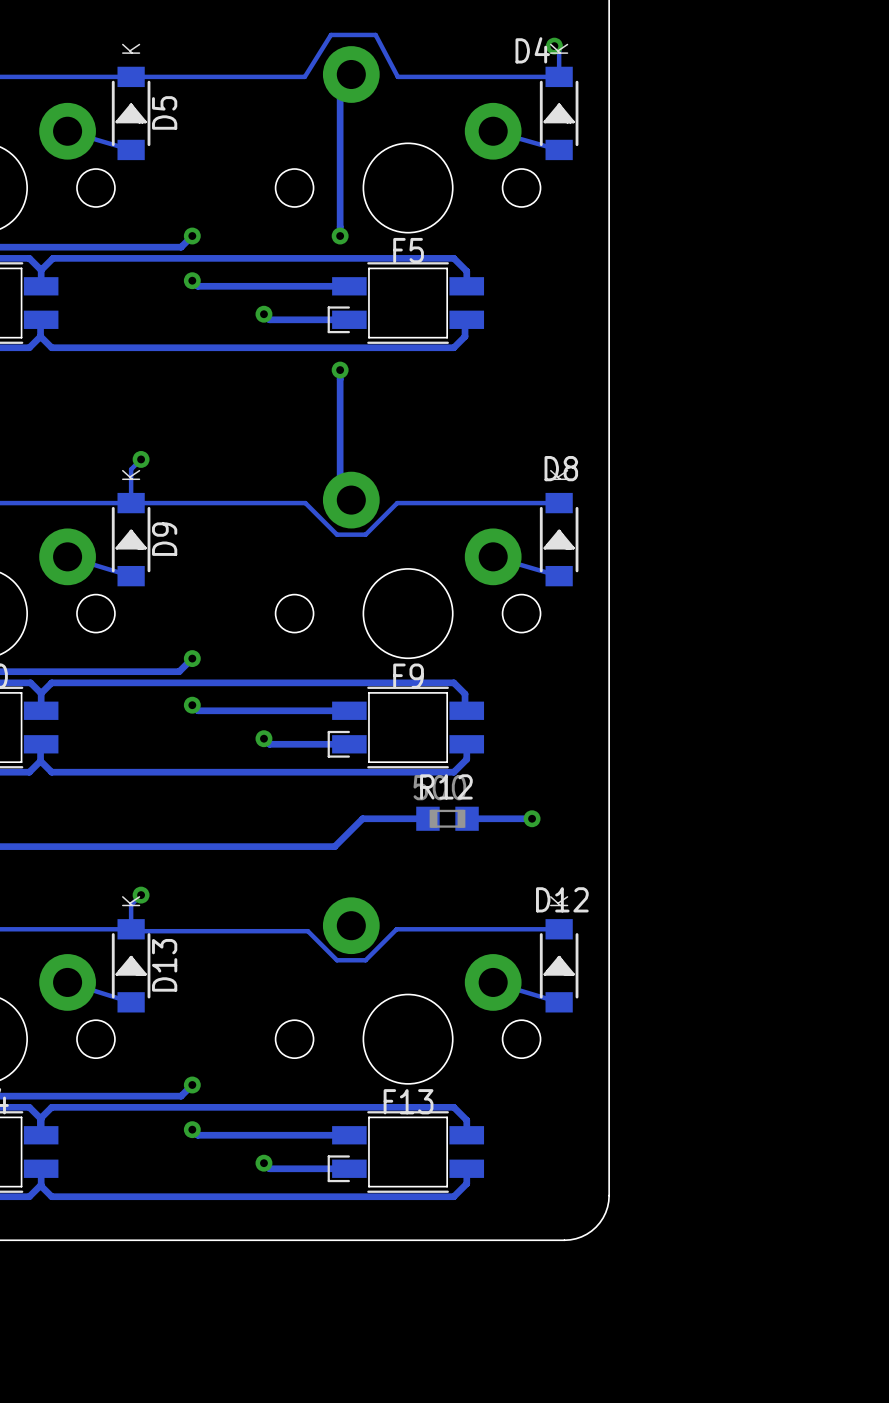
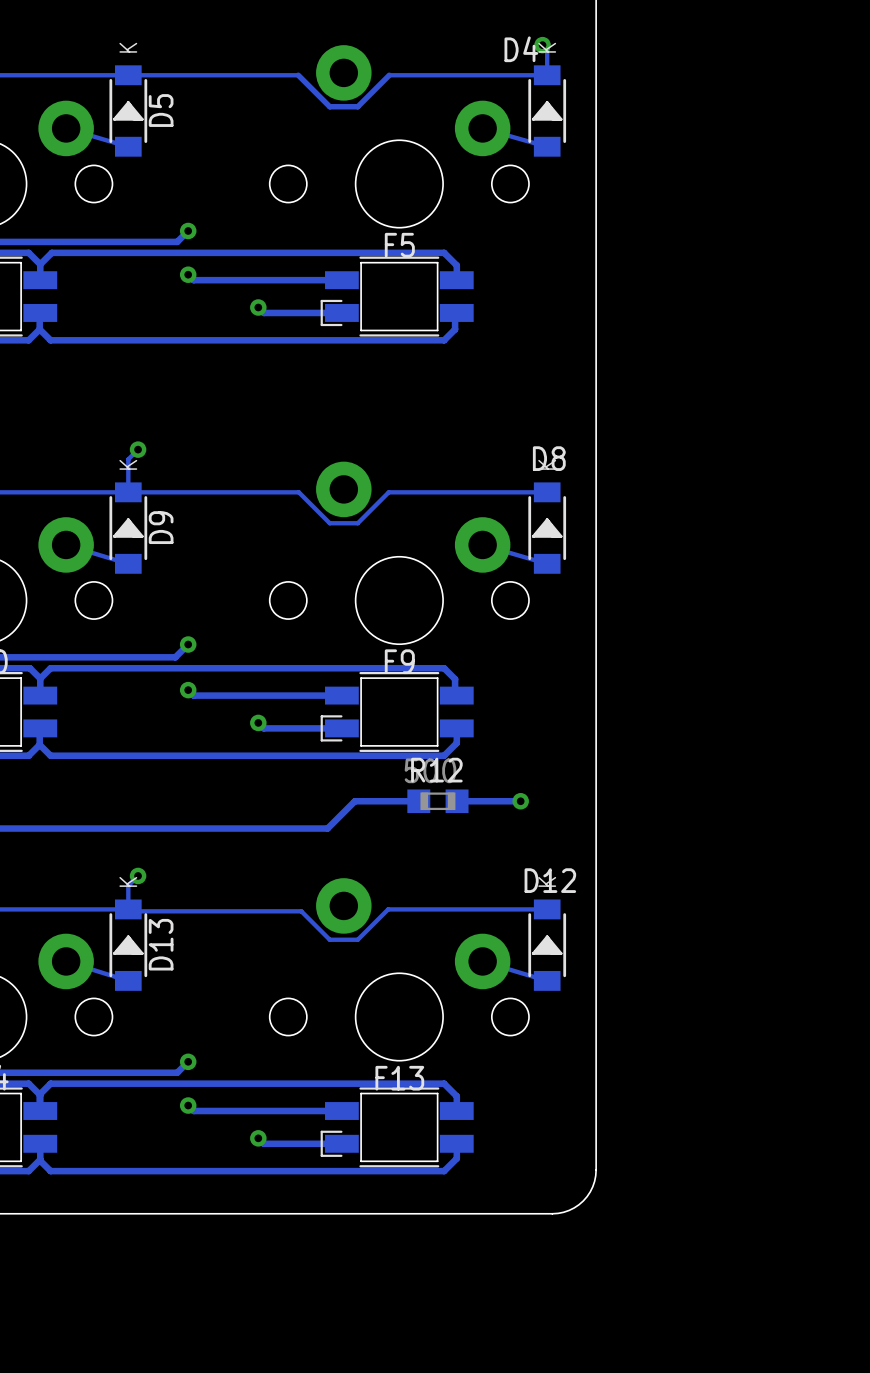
track: (351, 74) (340, 85) (340, 236) -> none
track: (397, 76) (375, 34) (330, 34) (304, 76) -> (389, 75) (357, 106) (329, 106) (298, 75)
via: (340, 236) -> none
track: (340, 370) (340, 488) (351, 500) -> none
via: (340, 370) -> none

